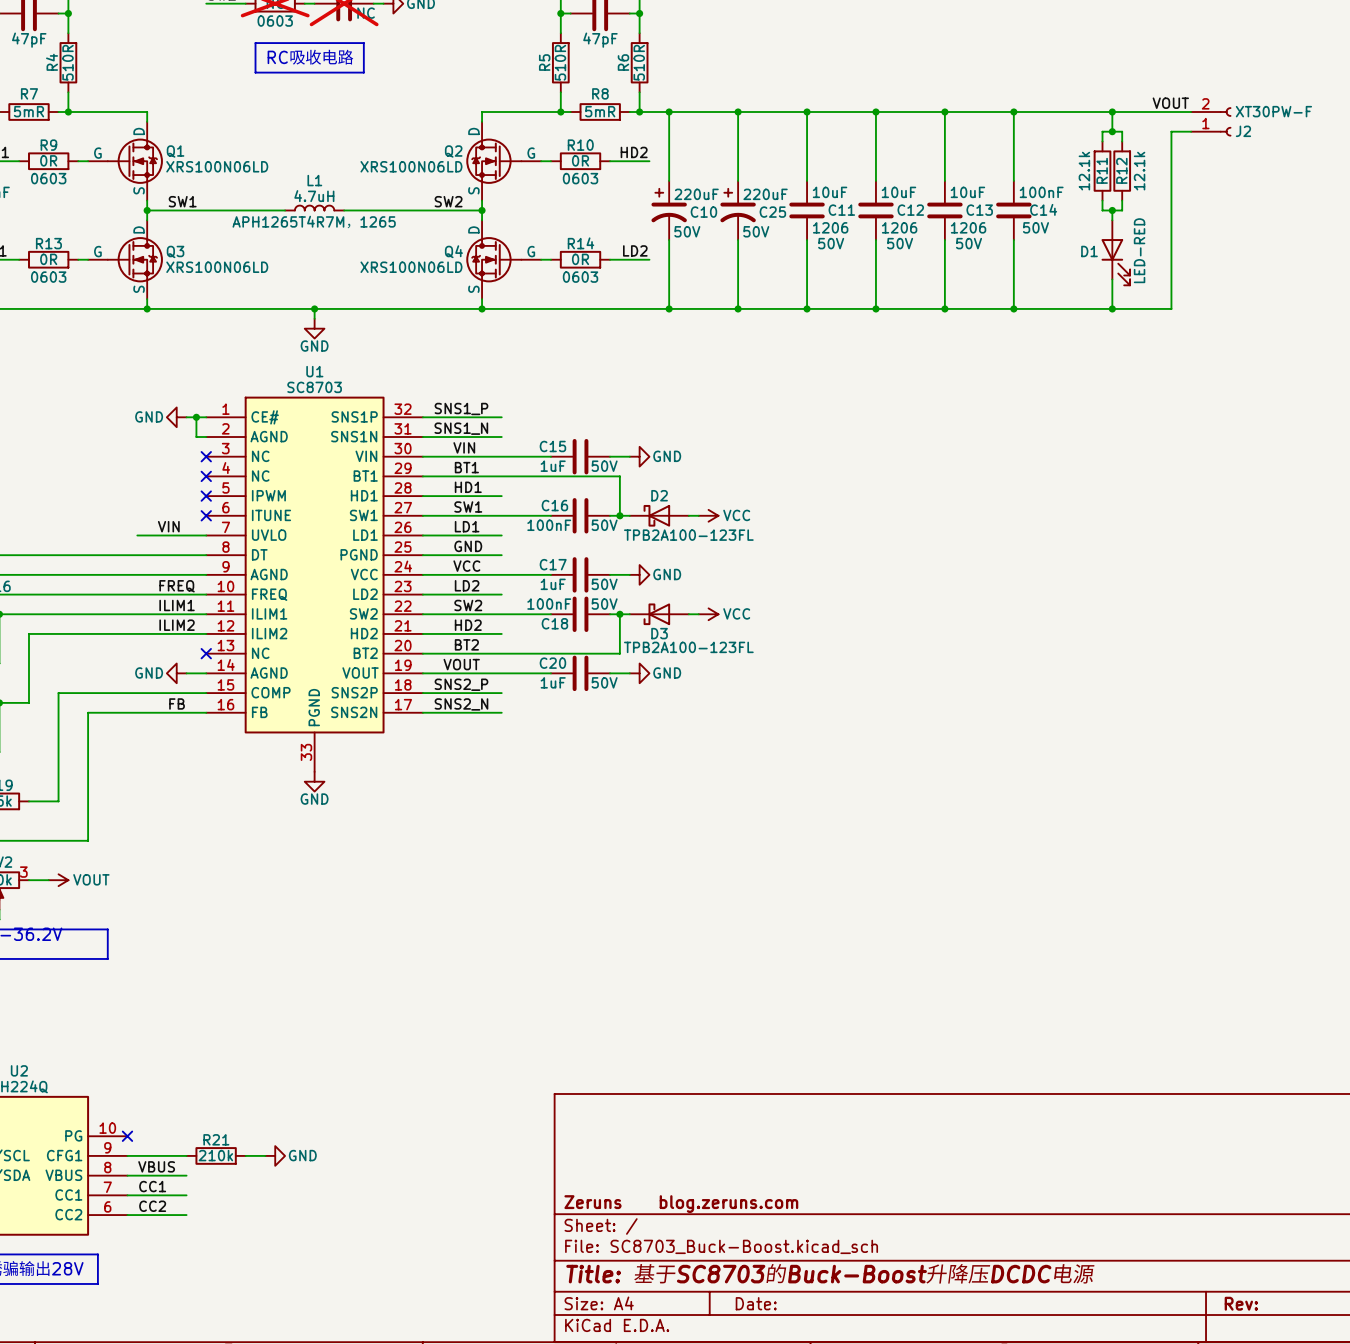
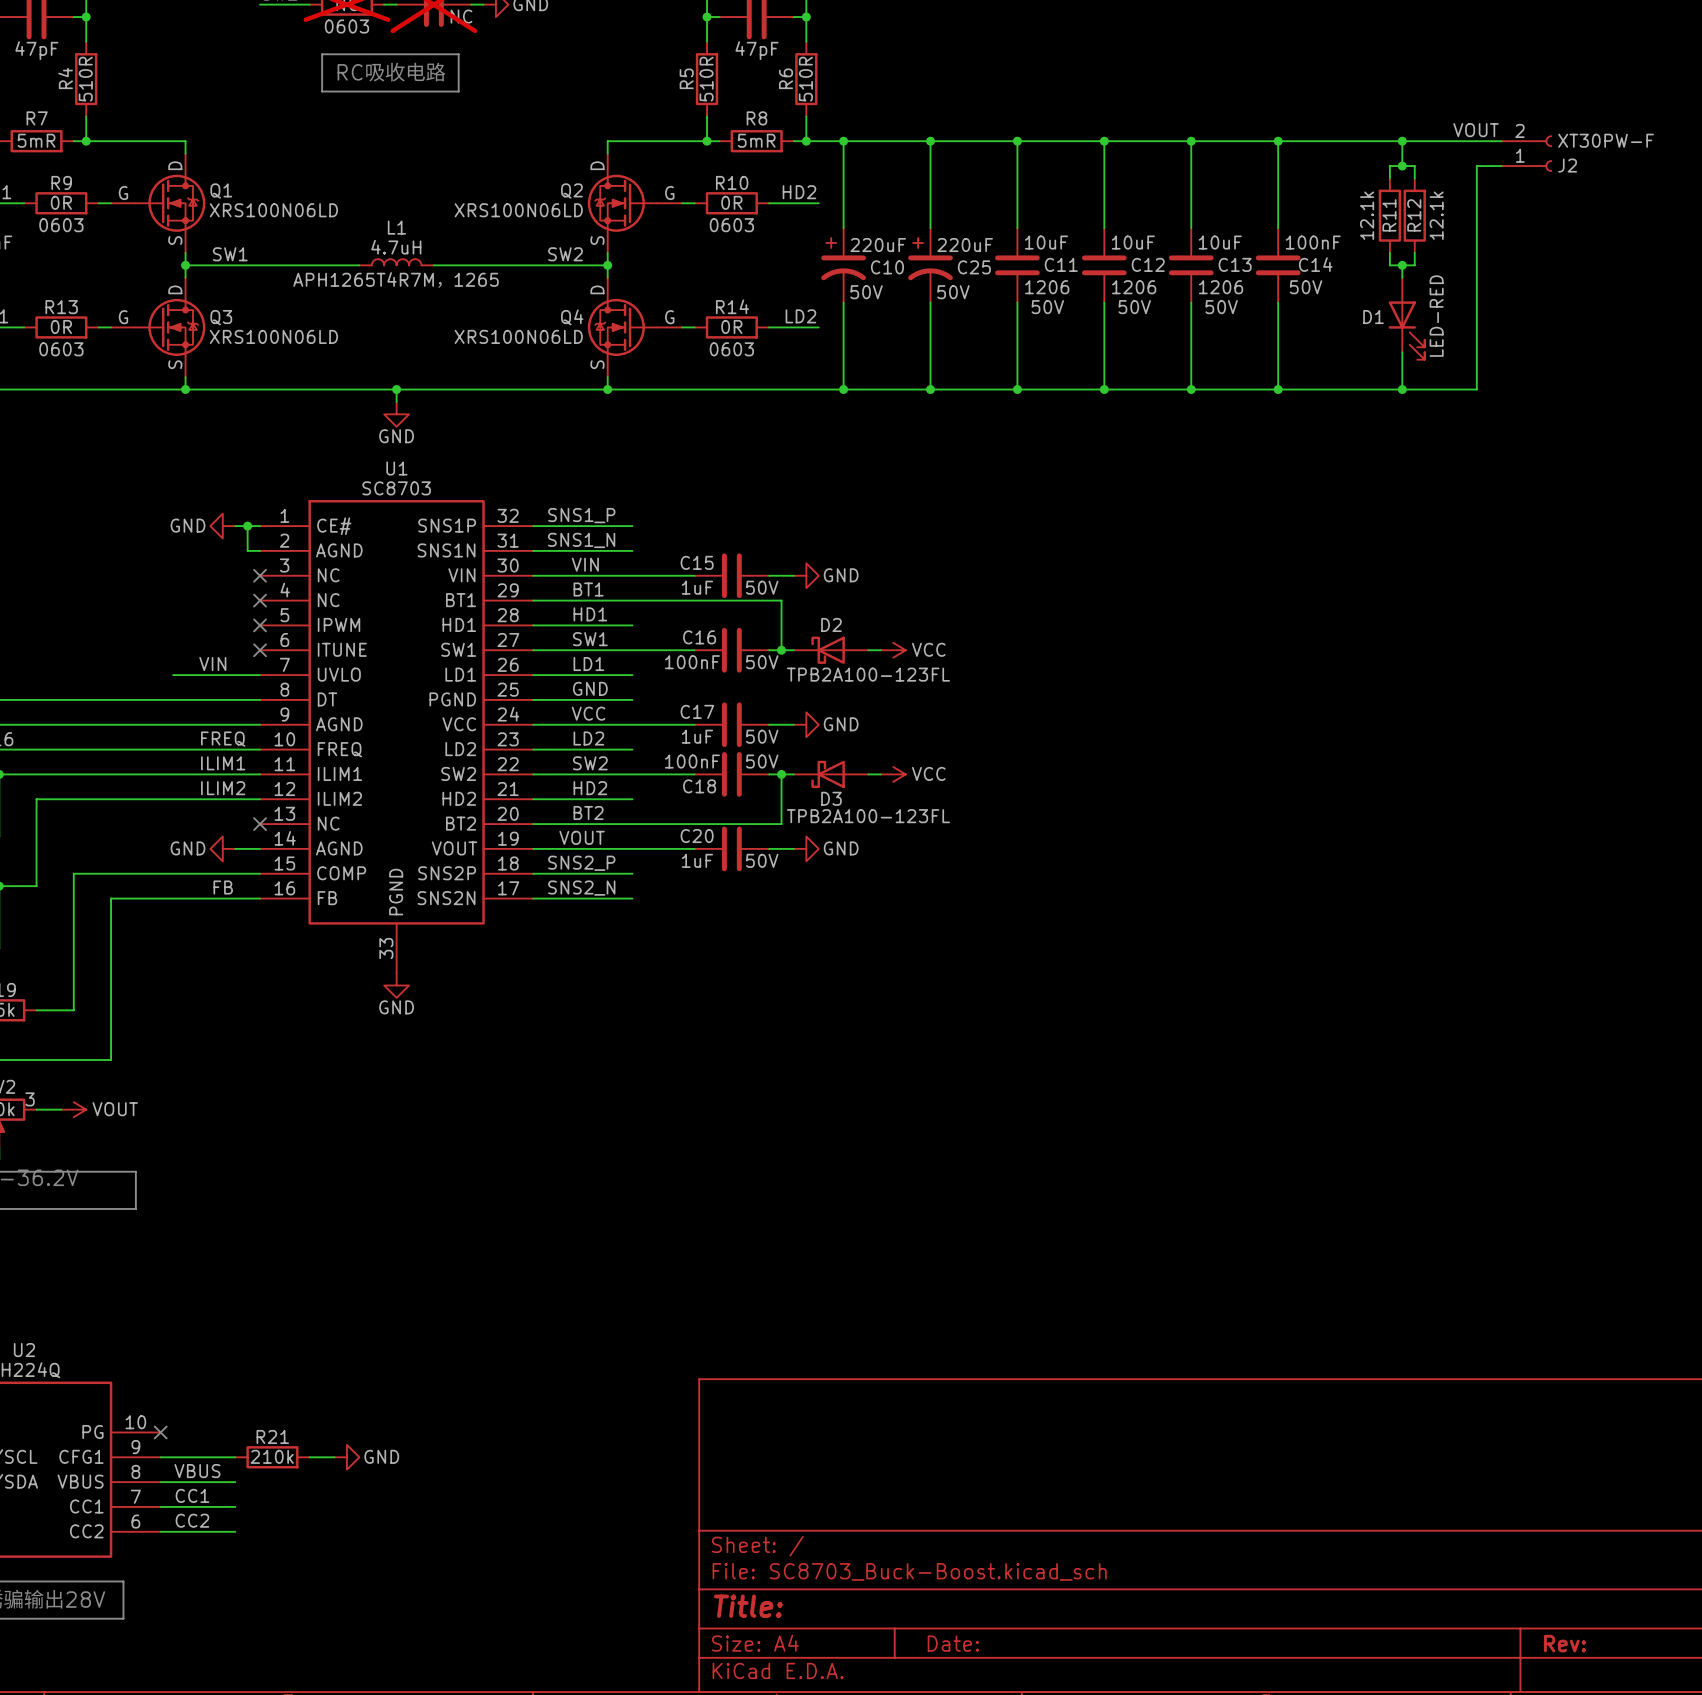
title block: Zeruns blog.zeruns.com (681, 1204) -> none
title block: Title: 基于SC8703的Buck-Boost升降压DCDC电源 (831, 1273) -> Title: (748, 1606)

